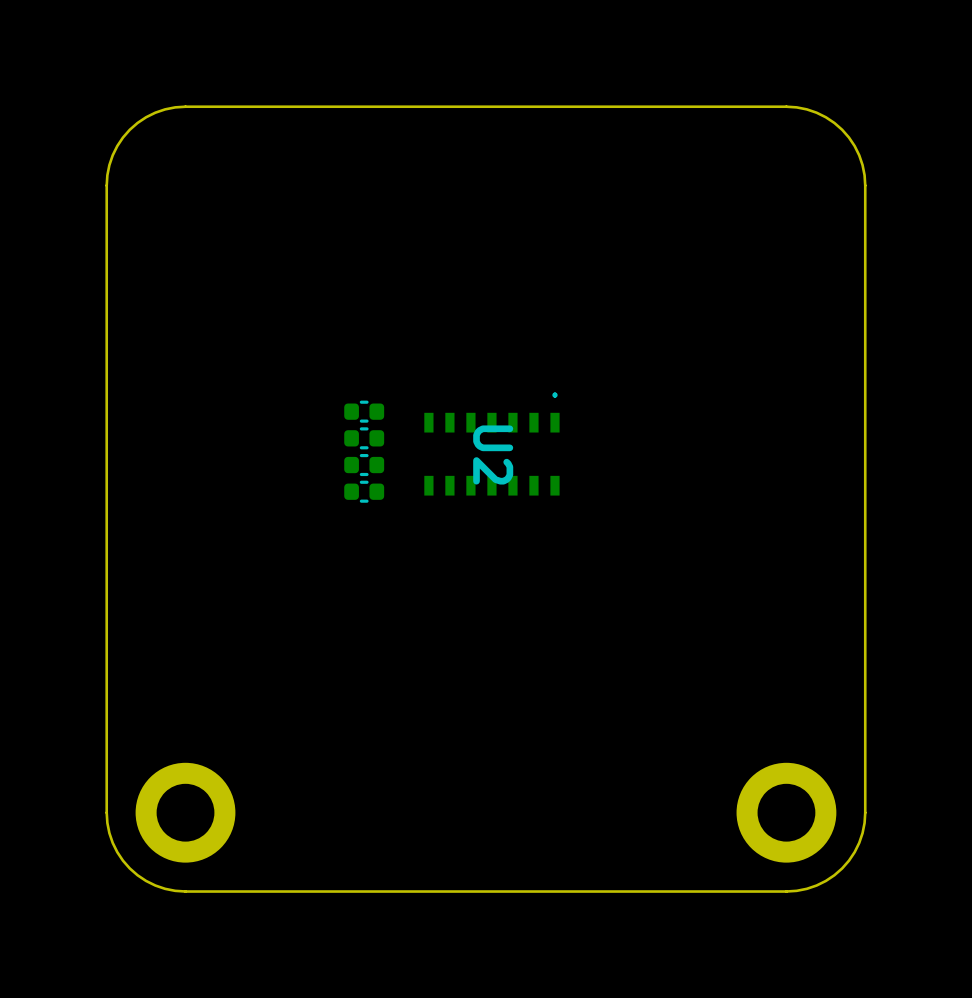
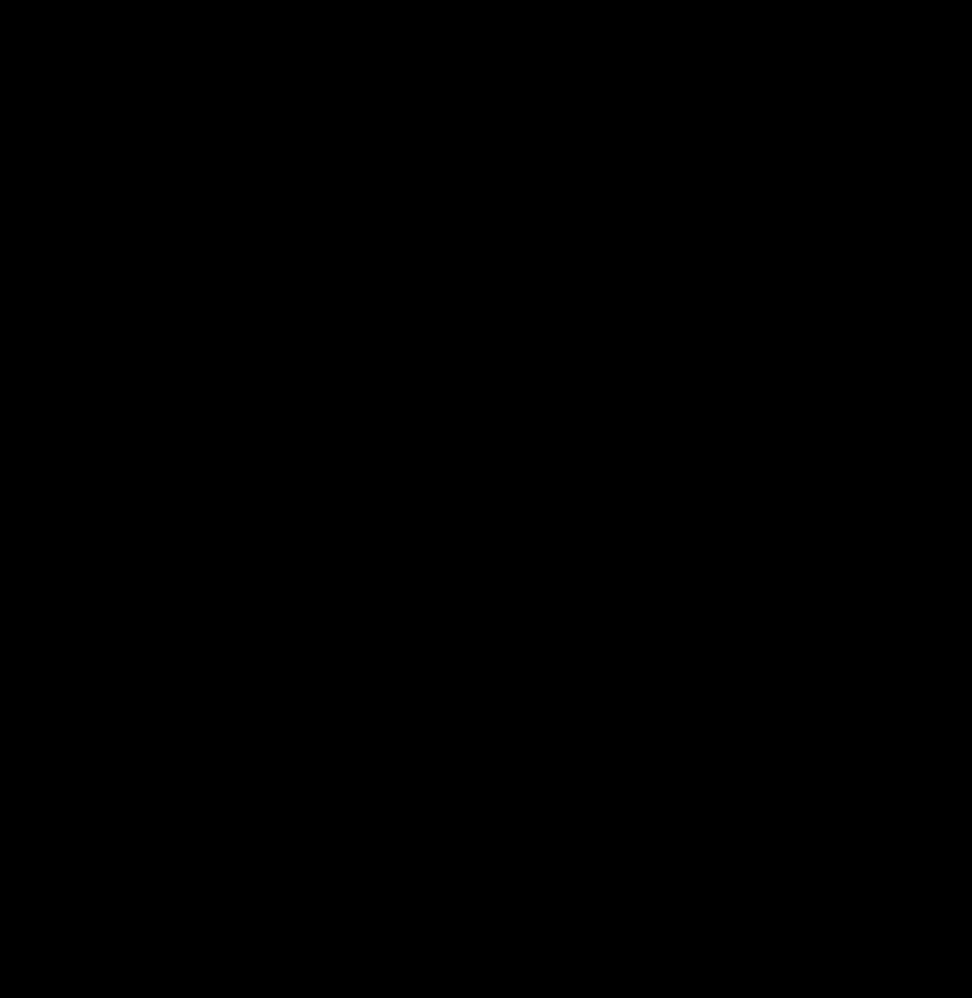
board edge: (786, 106) (185, 106) (165, 109) (146, 117) (122, 137) (112, 155) (106, 185) (106, 812) (109, 833) (117, 852) (137, 875) (165, 888) (185, 891) (786, 891) (806, 888) (825, 880) (848, 860) (859, 842) (865, 812) (864, 175) (859, 155) (842, 129) (816, 112) (786, 106) -> none
part: (364, 411) -> none
part: (364, 438) -> none
U2: (491, 444) -> none
part: (364, 465) -> none
part: (364, 491) -> none
part: (185, 812) -> none
part: (786, 812) -> none

